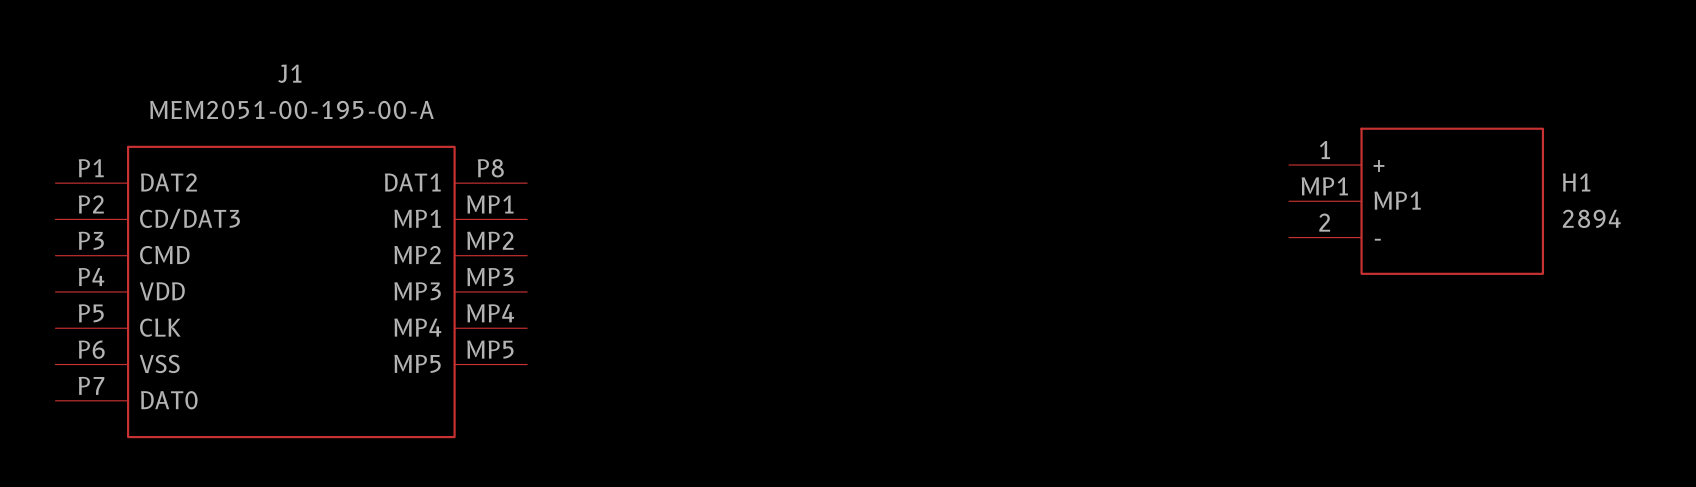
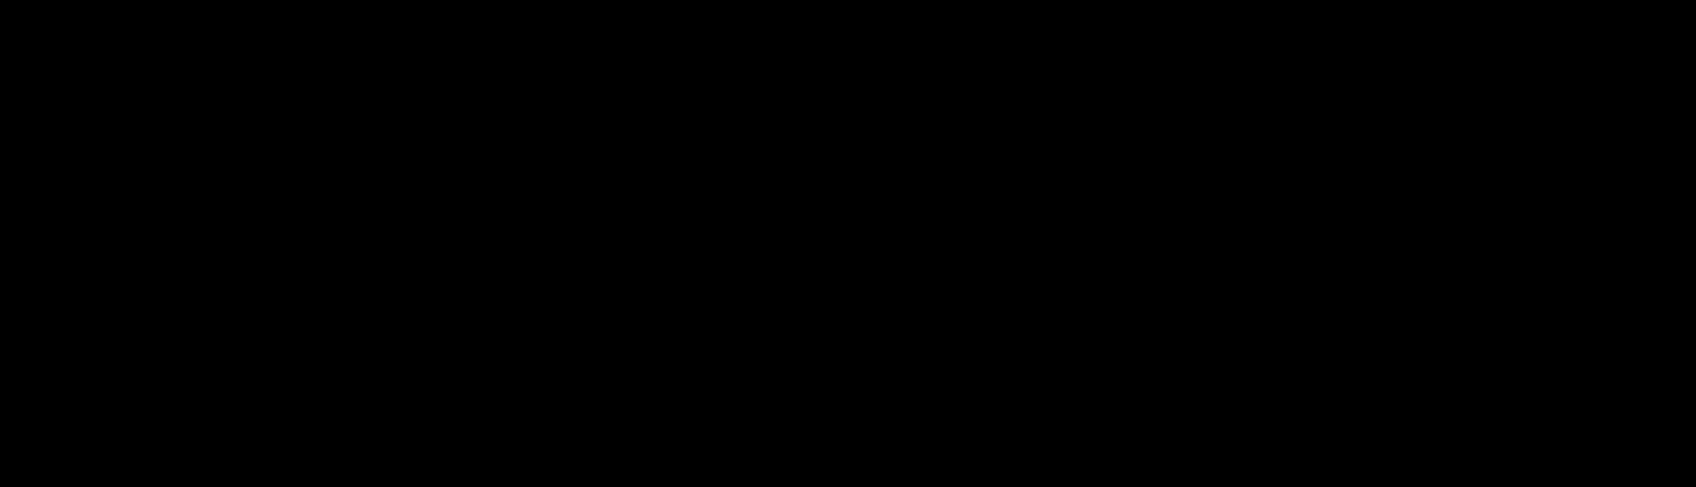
H1: 2894 (1416, 201) -> none
J1: MEM2051-00-195-00-A (291, 291) -> none

